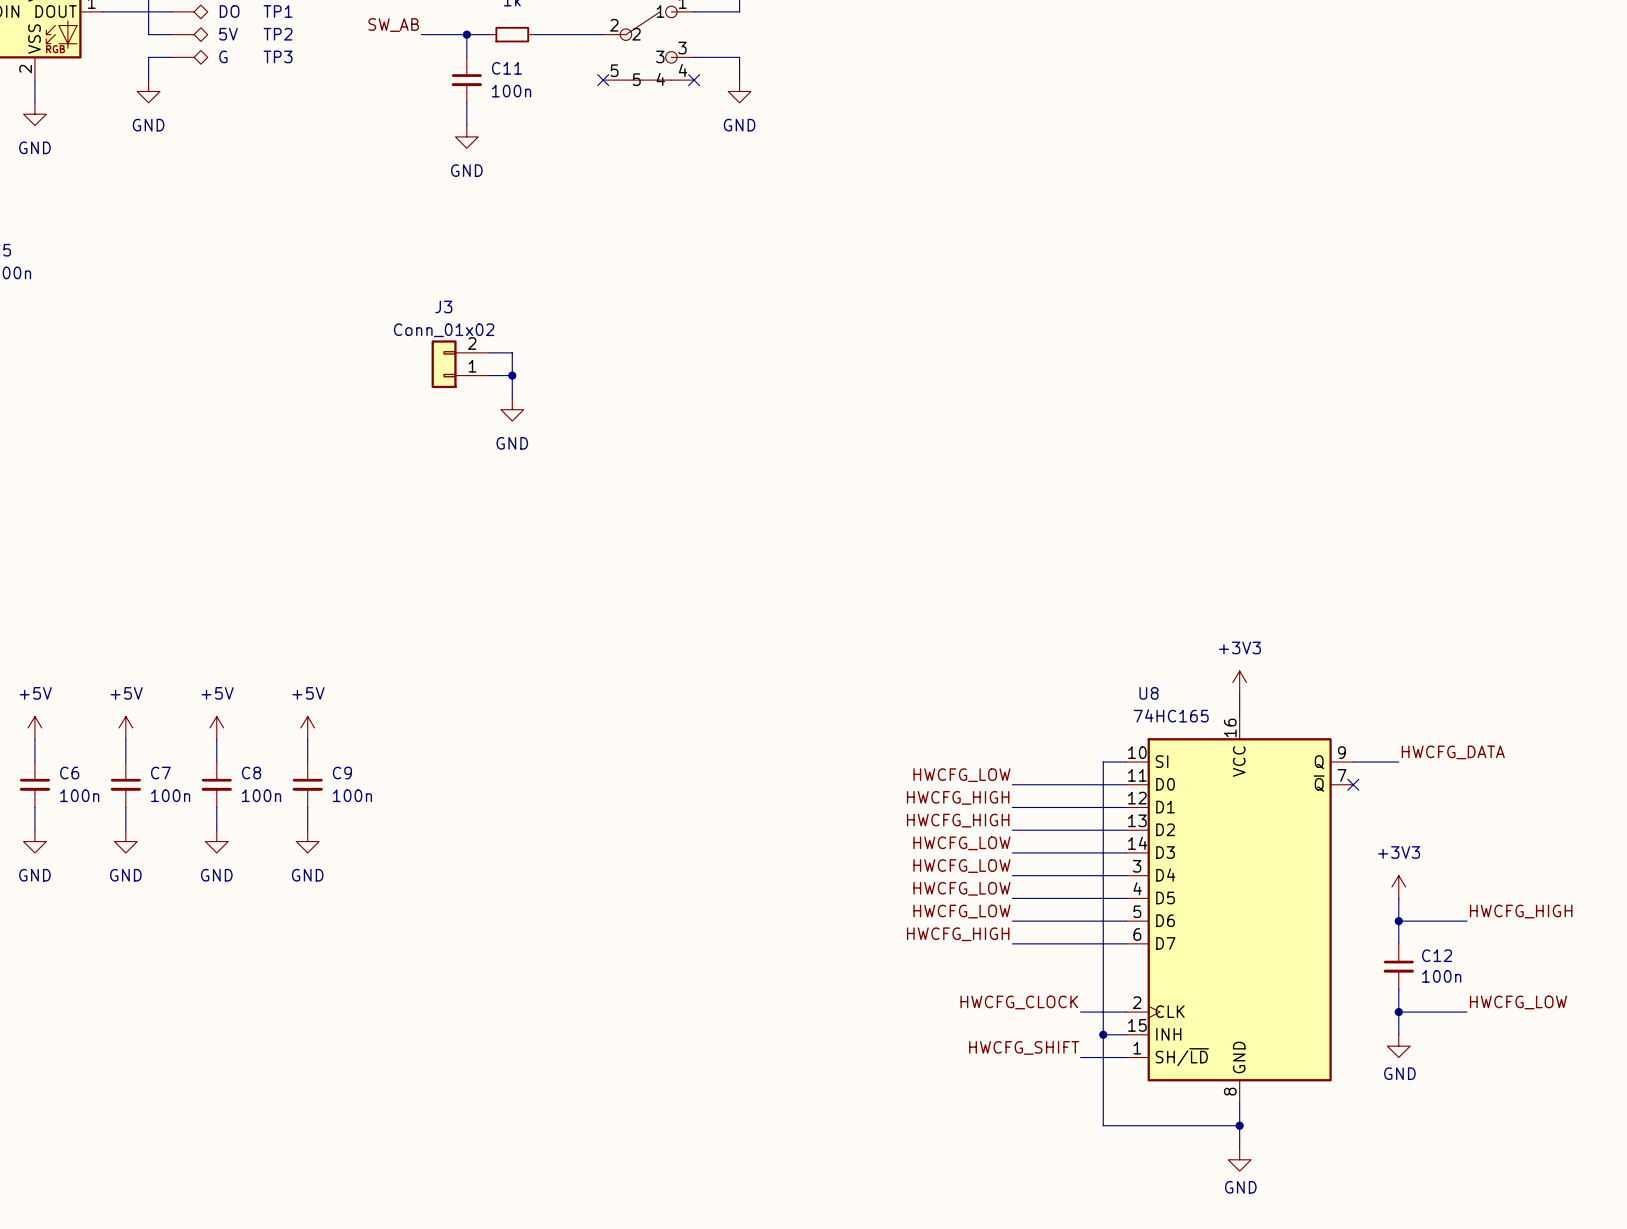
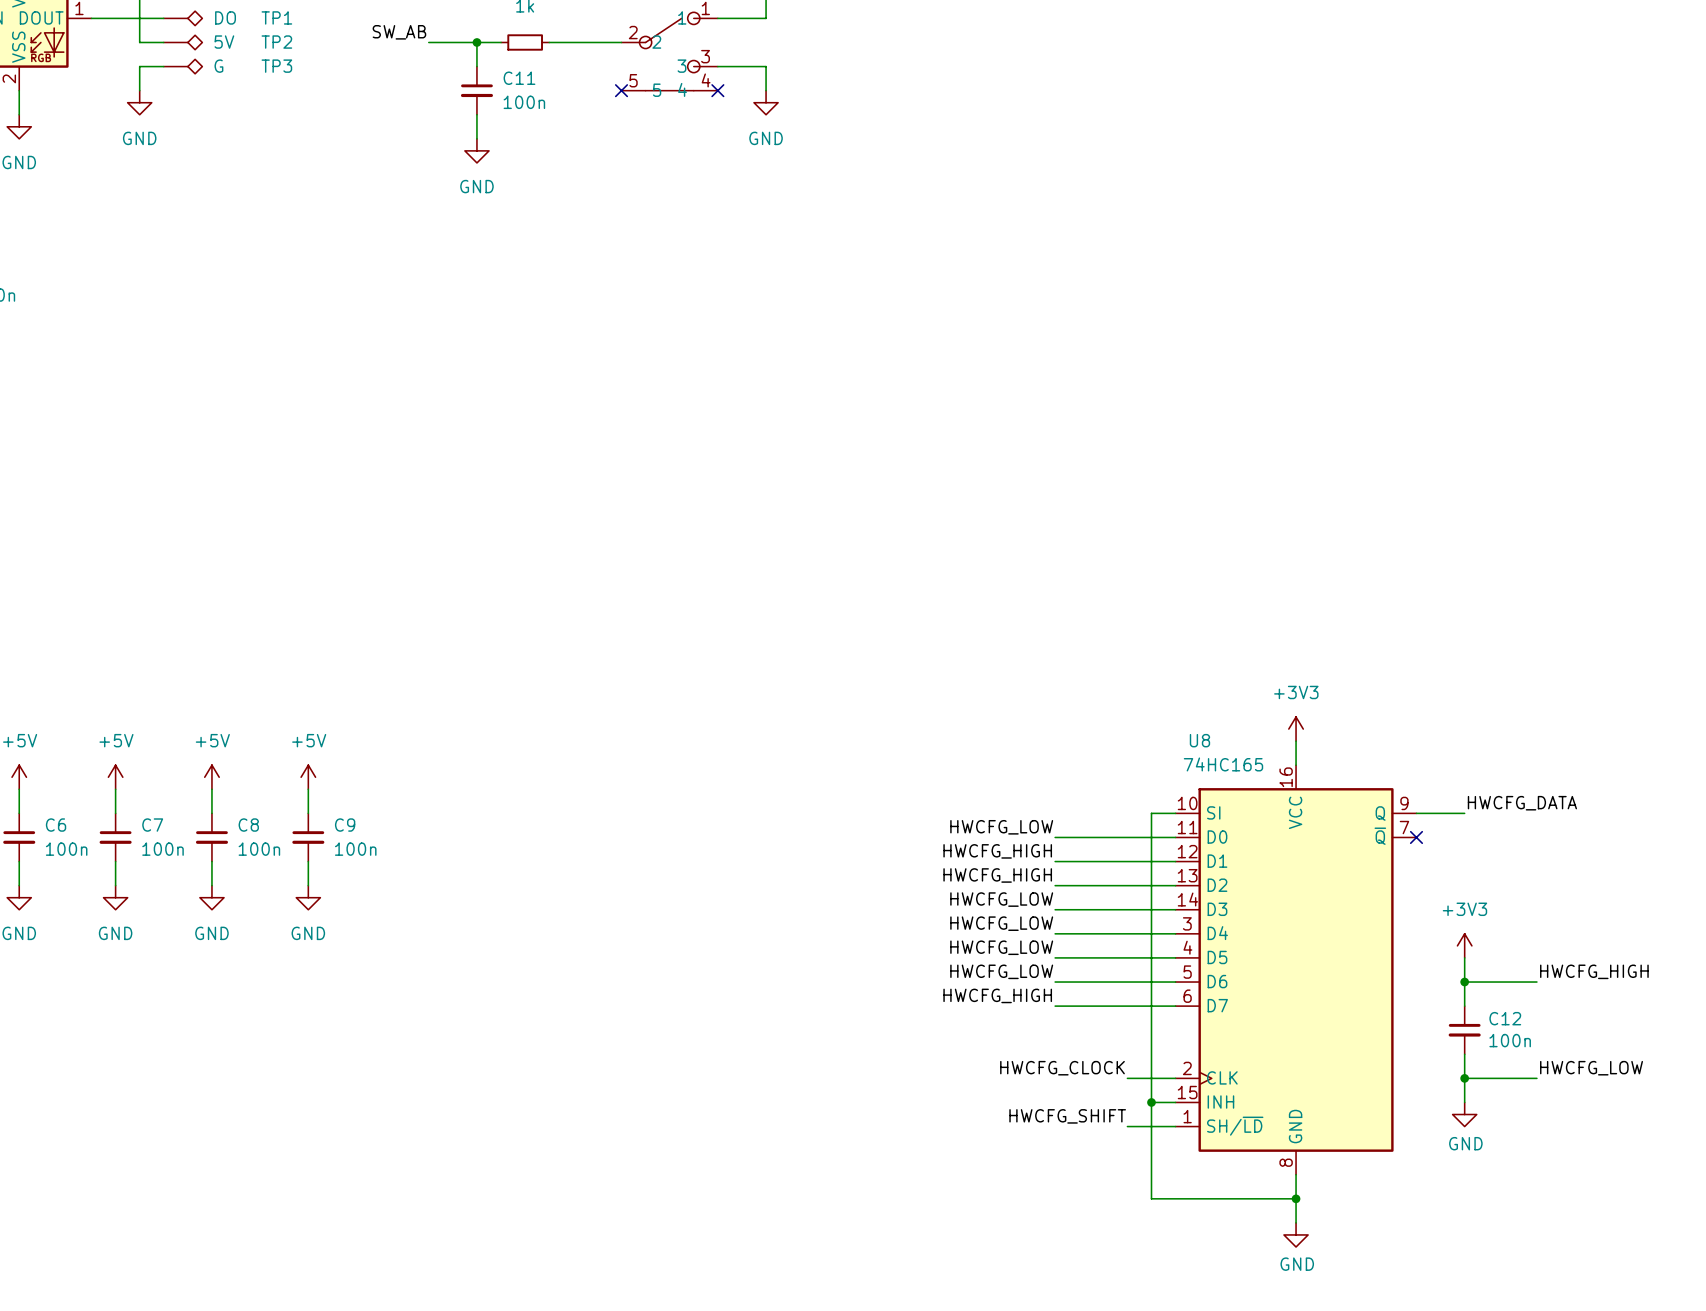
wire: (489, 352) (512, 352) (512, 398) -> none
J3: Conn_01x02 (460, 364) -> none
wire: (489, 375) (512, 375) -> none
junction: (512, 375) -> none
power symbol: GND (512, 409) -> none

